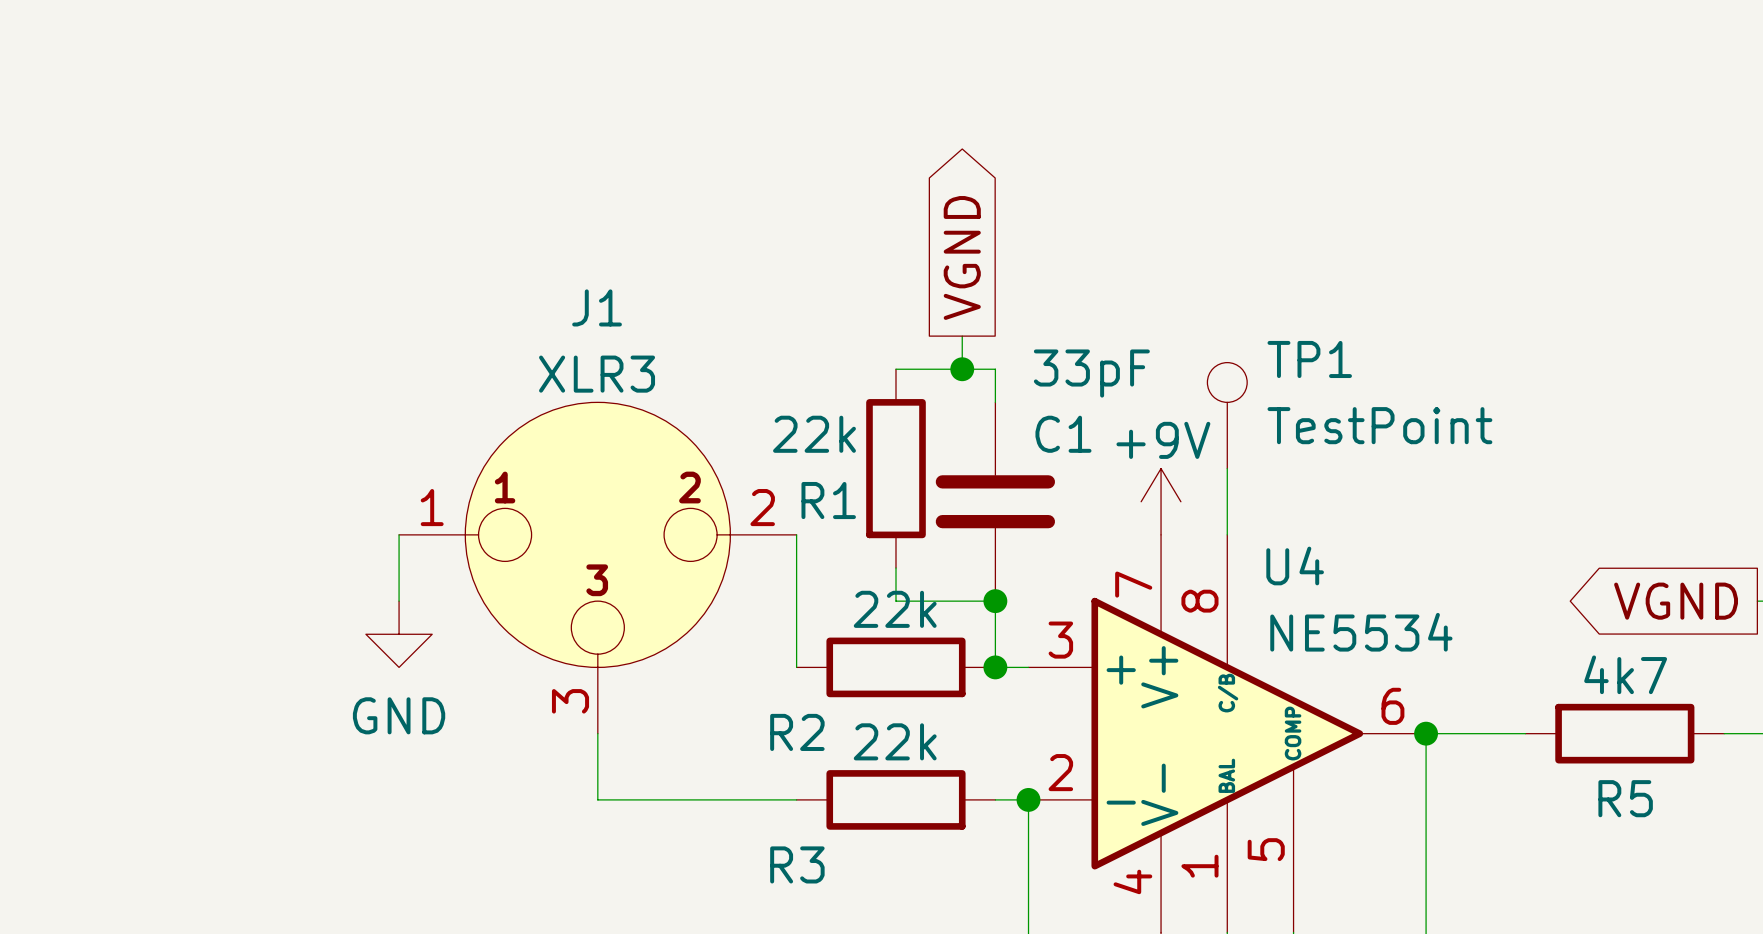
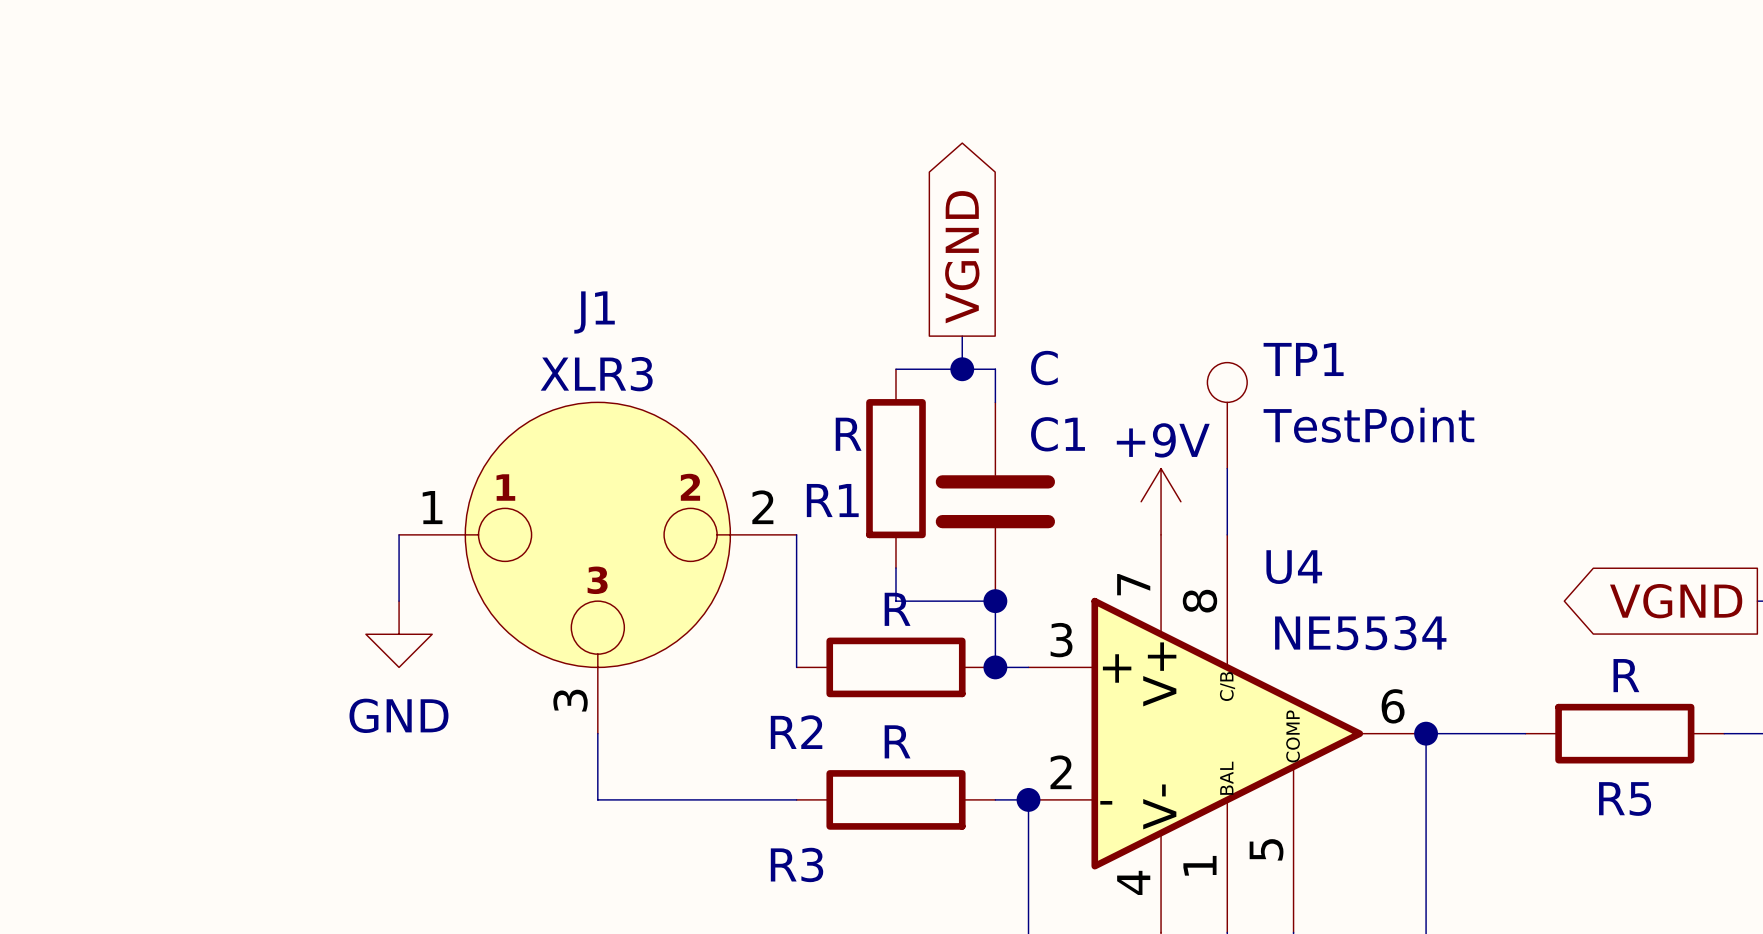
C1 value: 33pF (1091, 373) -> C (1044, 368)
R1 value: 22k (814, 434) -> R (848, 434)
R2 value: 22k (895, 609) -> R (897, 609)
R5 value: 4k7 (1625, 674) -> R (1626, 675)
R3 value: 22k (895, 741) -> R (897, 741)

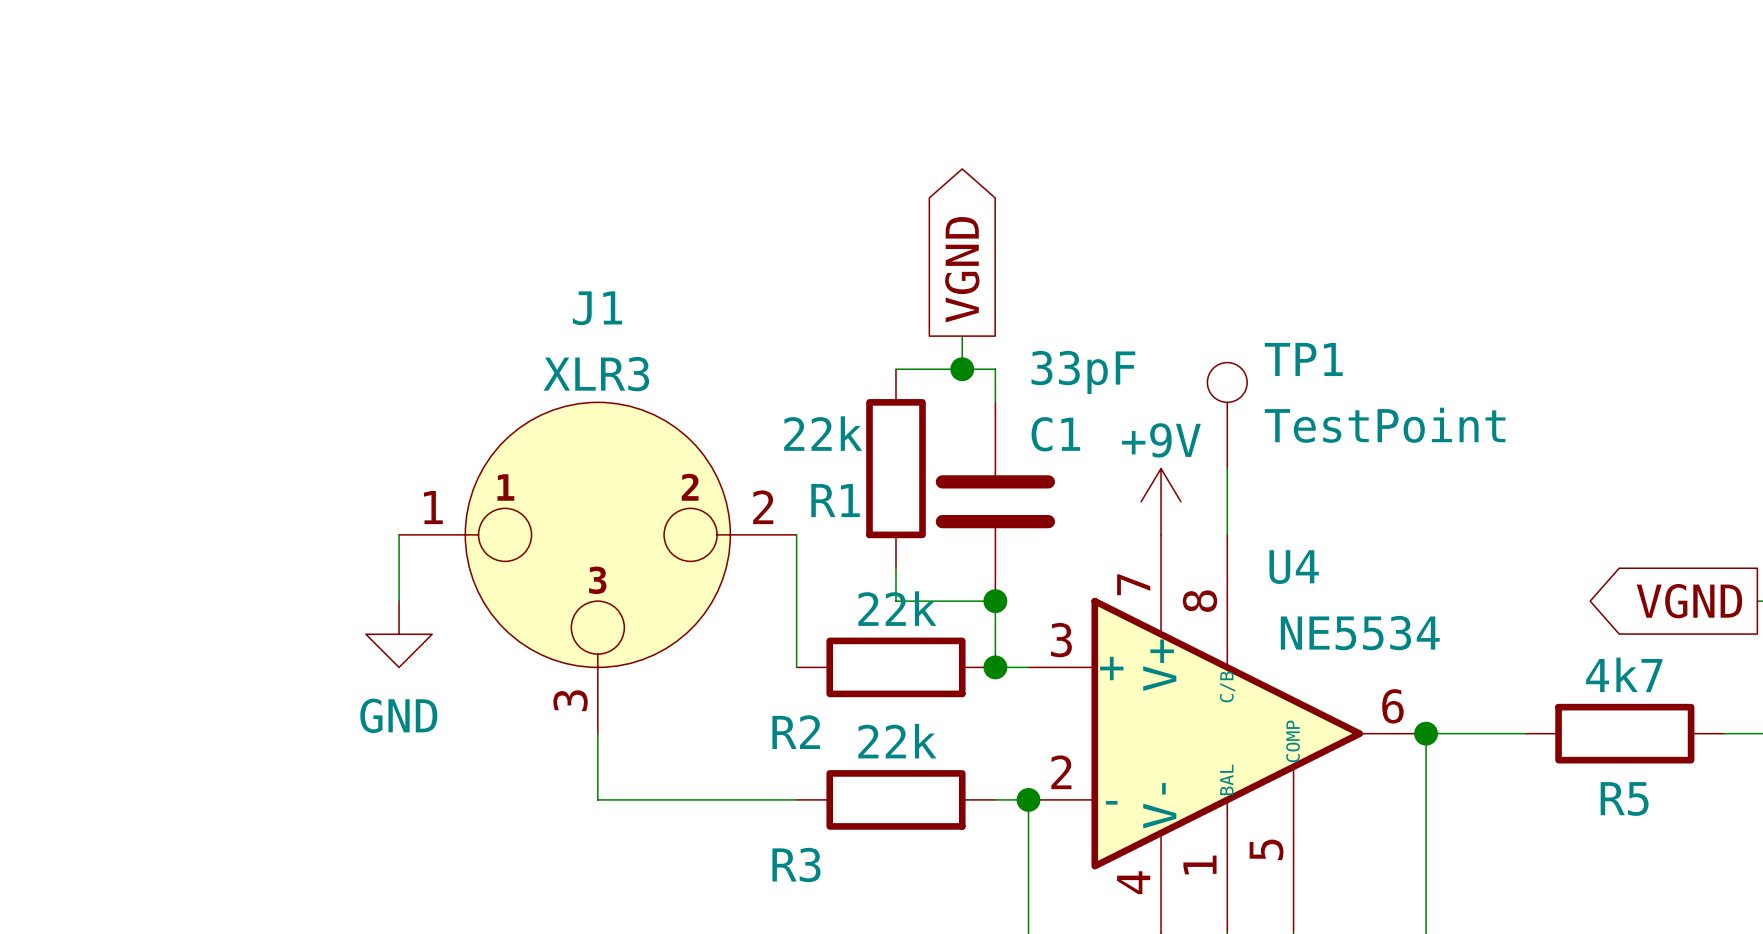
C1 value: C (1044, 368) -> 33pF (1083, 372)
R1 value: R (848, 434) -> 22k (823, 433)
R2 value: R (897, 609) -> 22k (897, 608)
R5 value: R (1626, 675) -> 4k7 (1624, 674)
R3 value: R (897, 741) -> 22k (897, 741)

